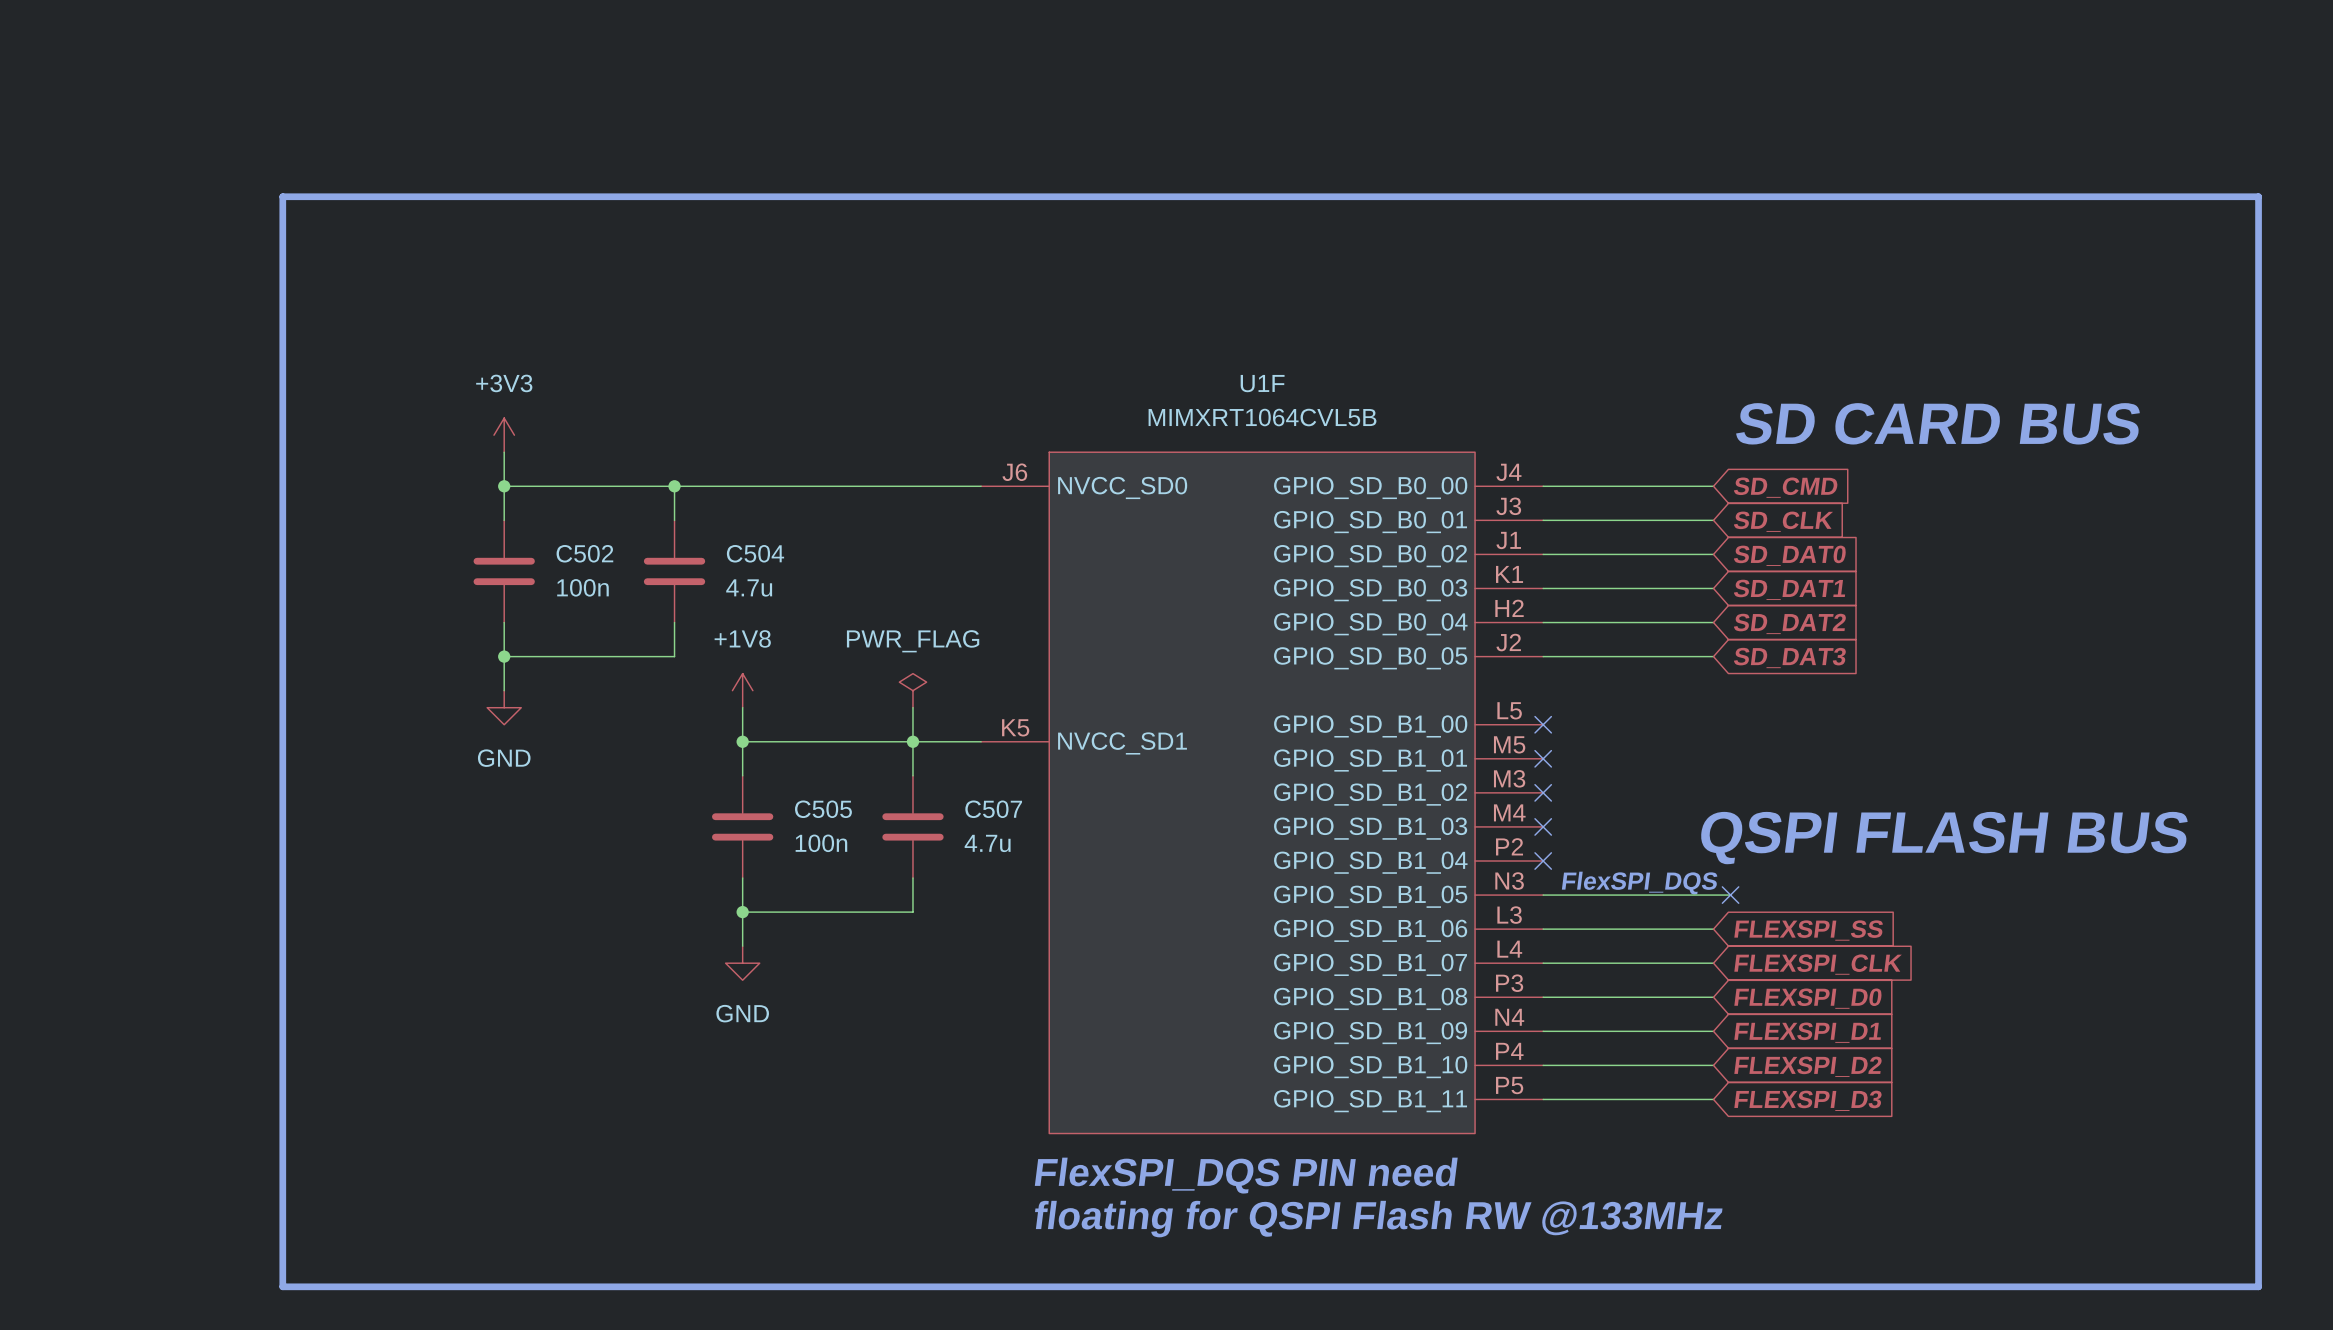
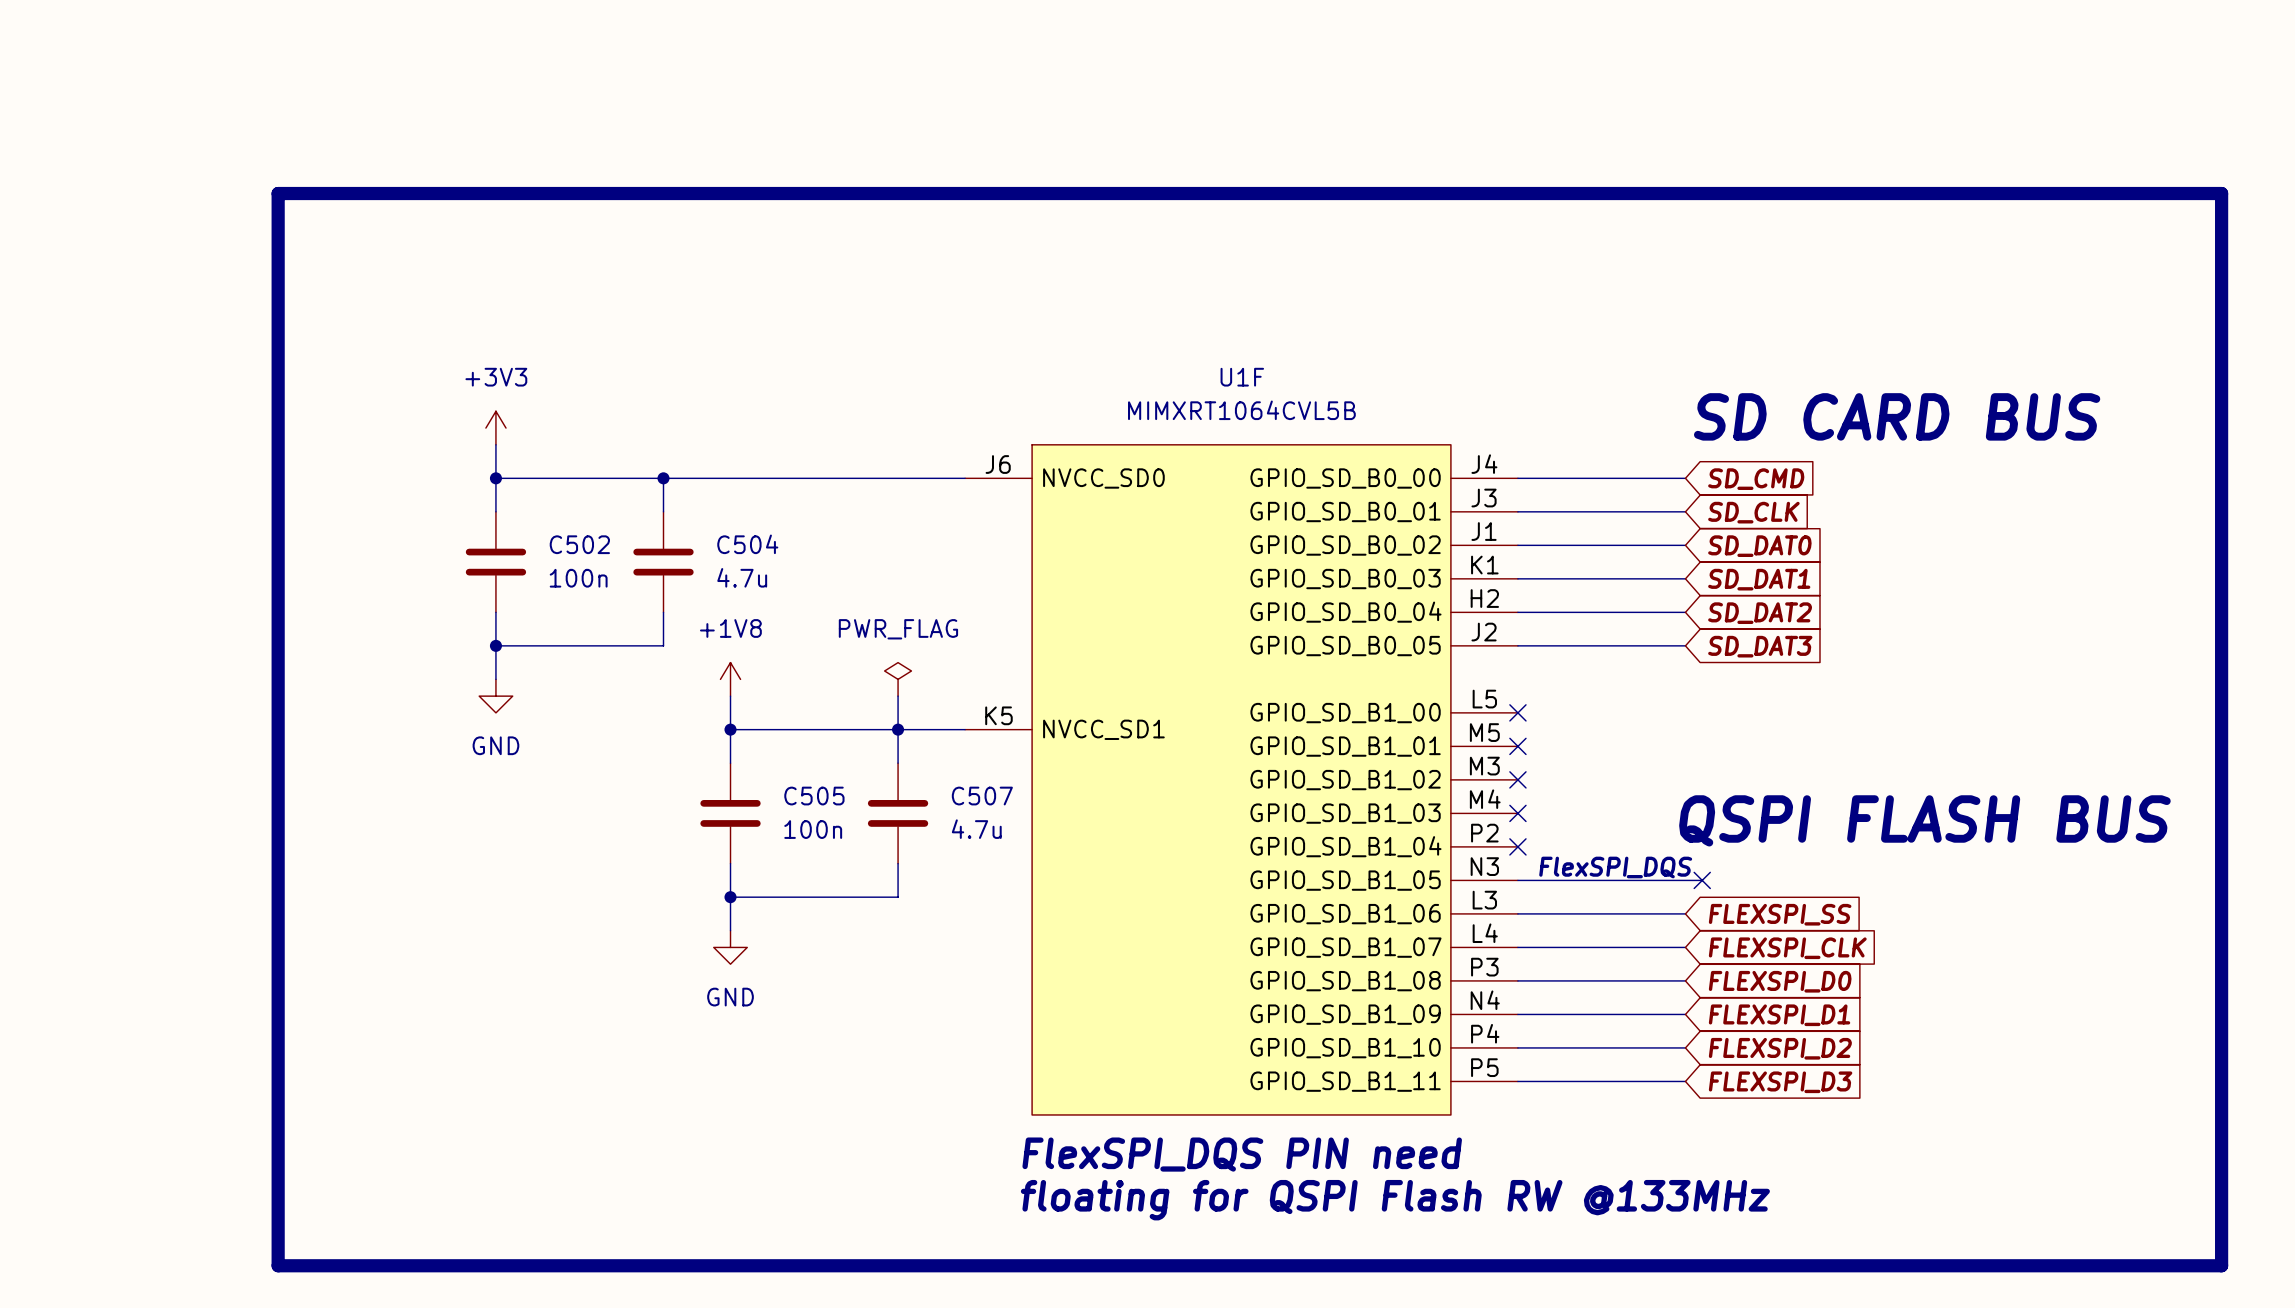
line width: thin (282, 196) (282, 1286) (2258, 1286) (2258, 196) (282, 196) -> thick (278, 193) (278, 1265) (2221, 1265) (2221, 193) (278, 193)

